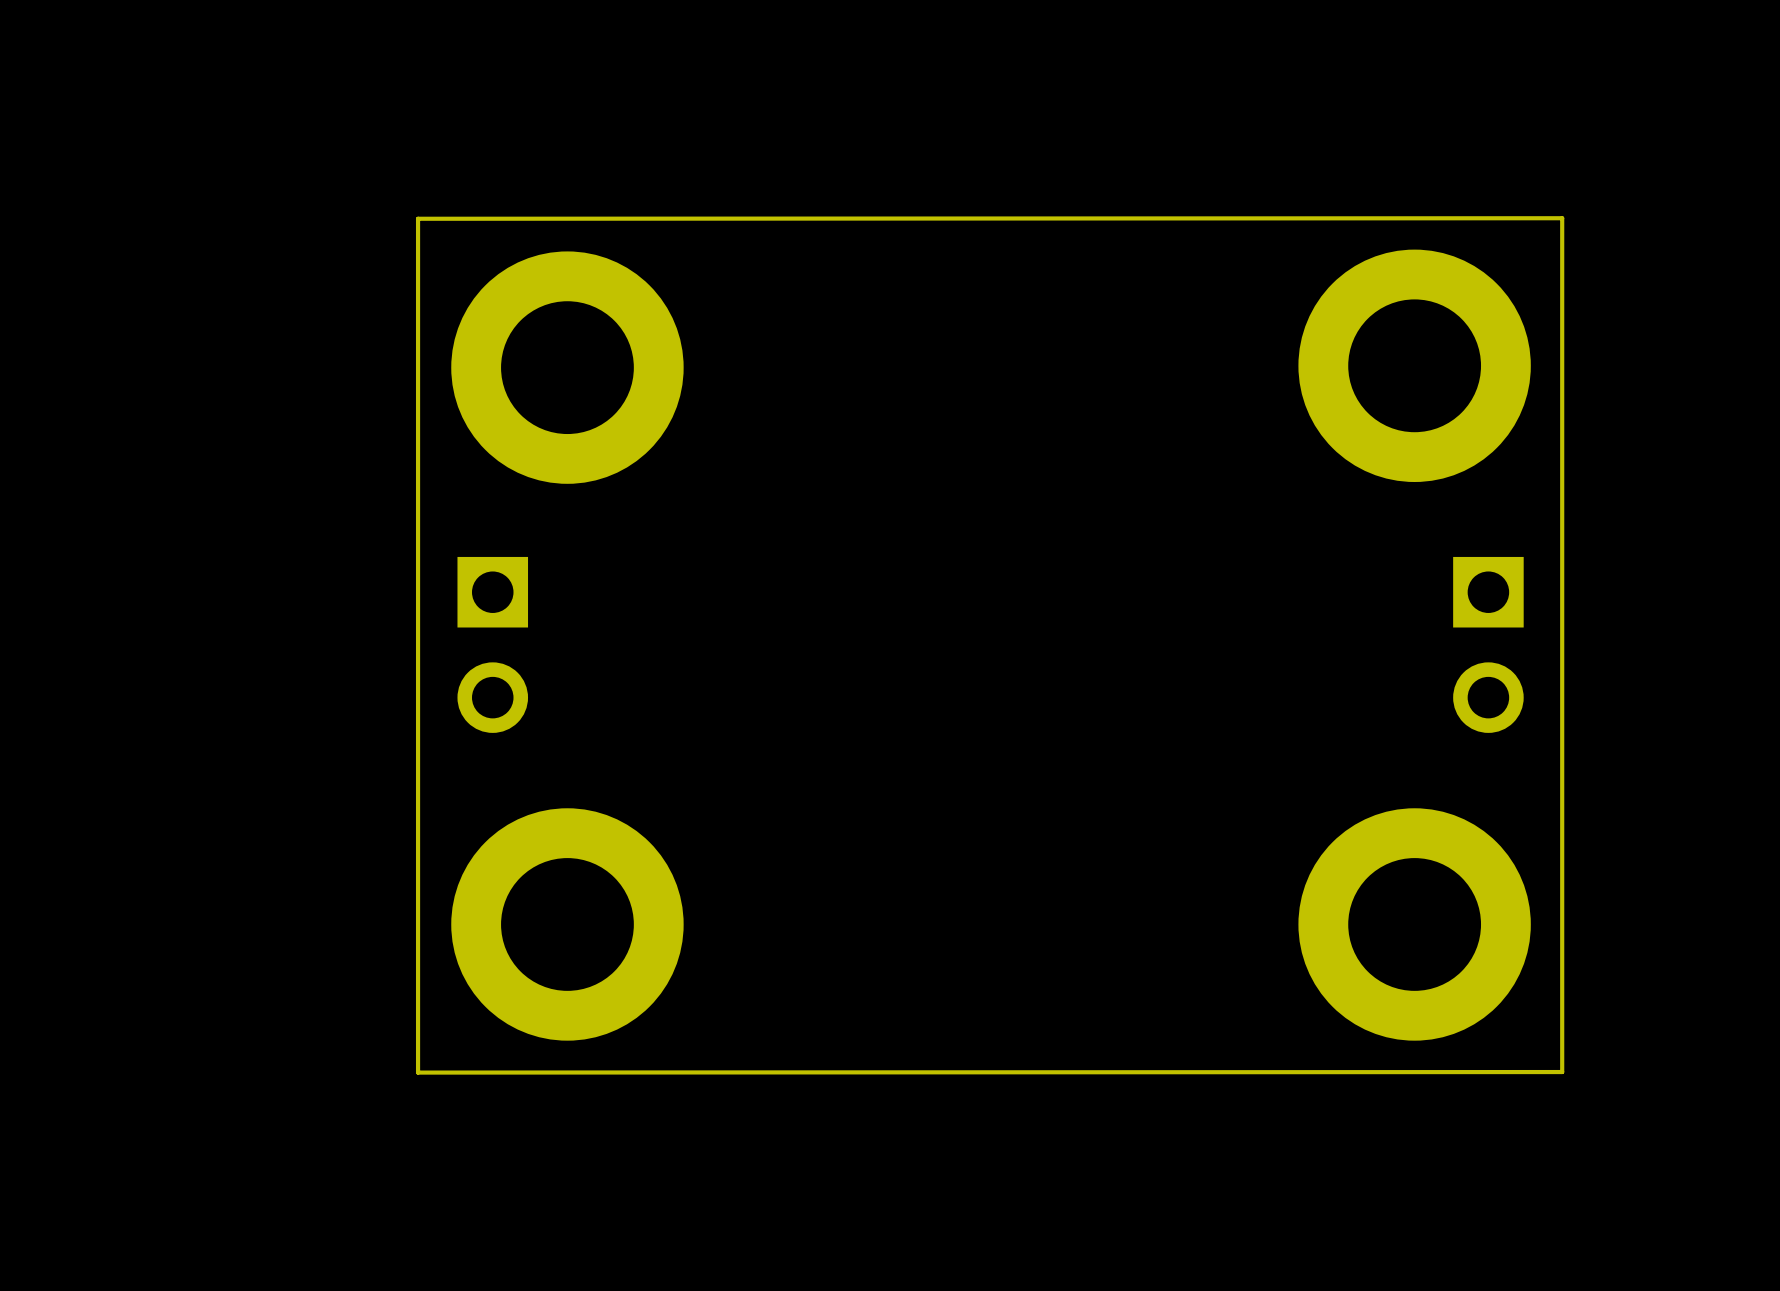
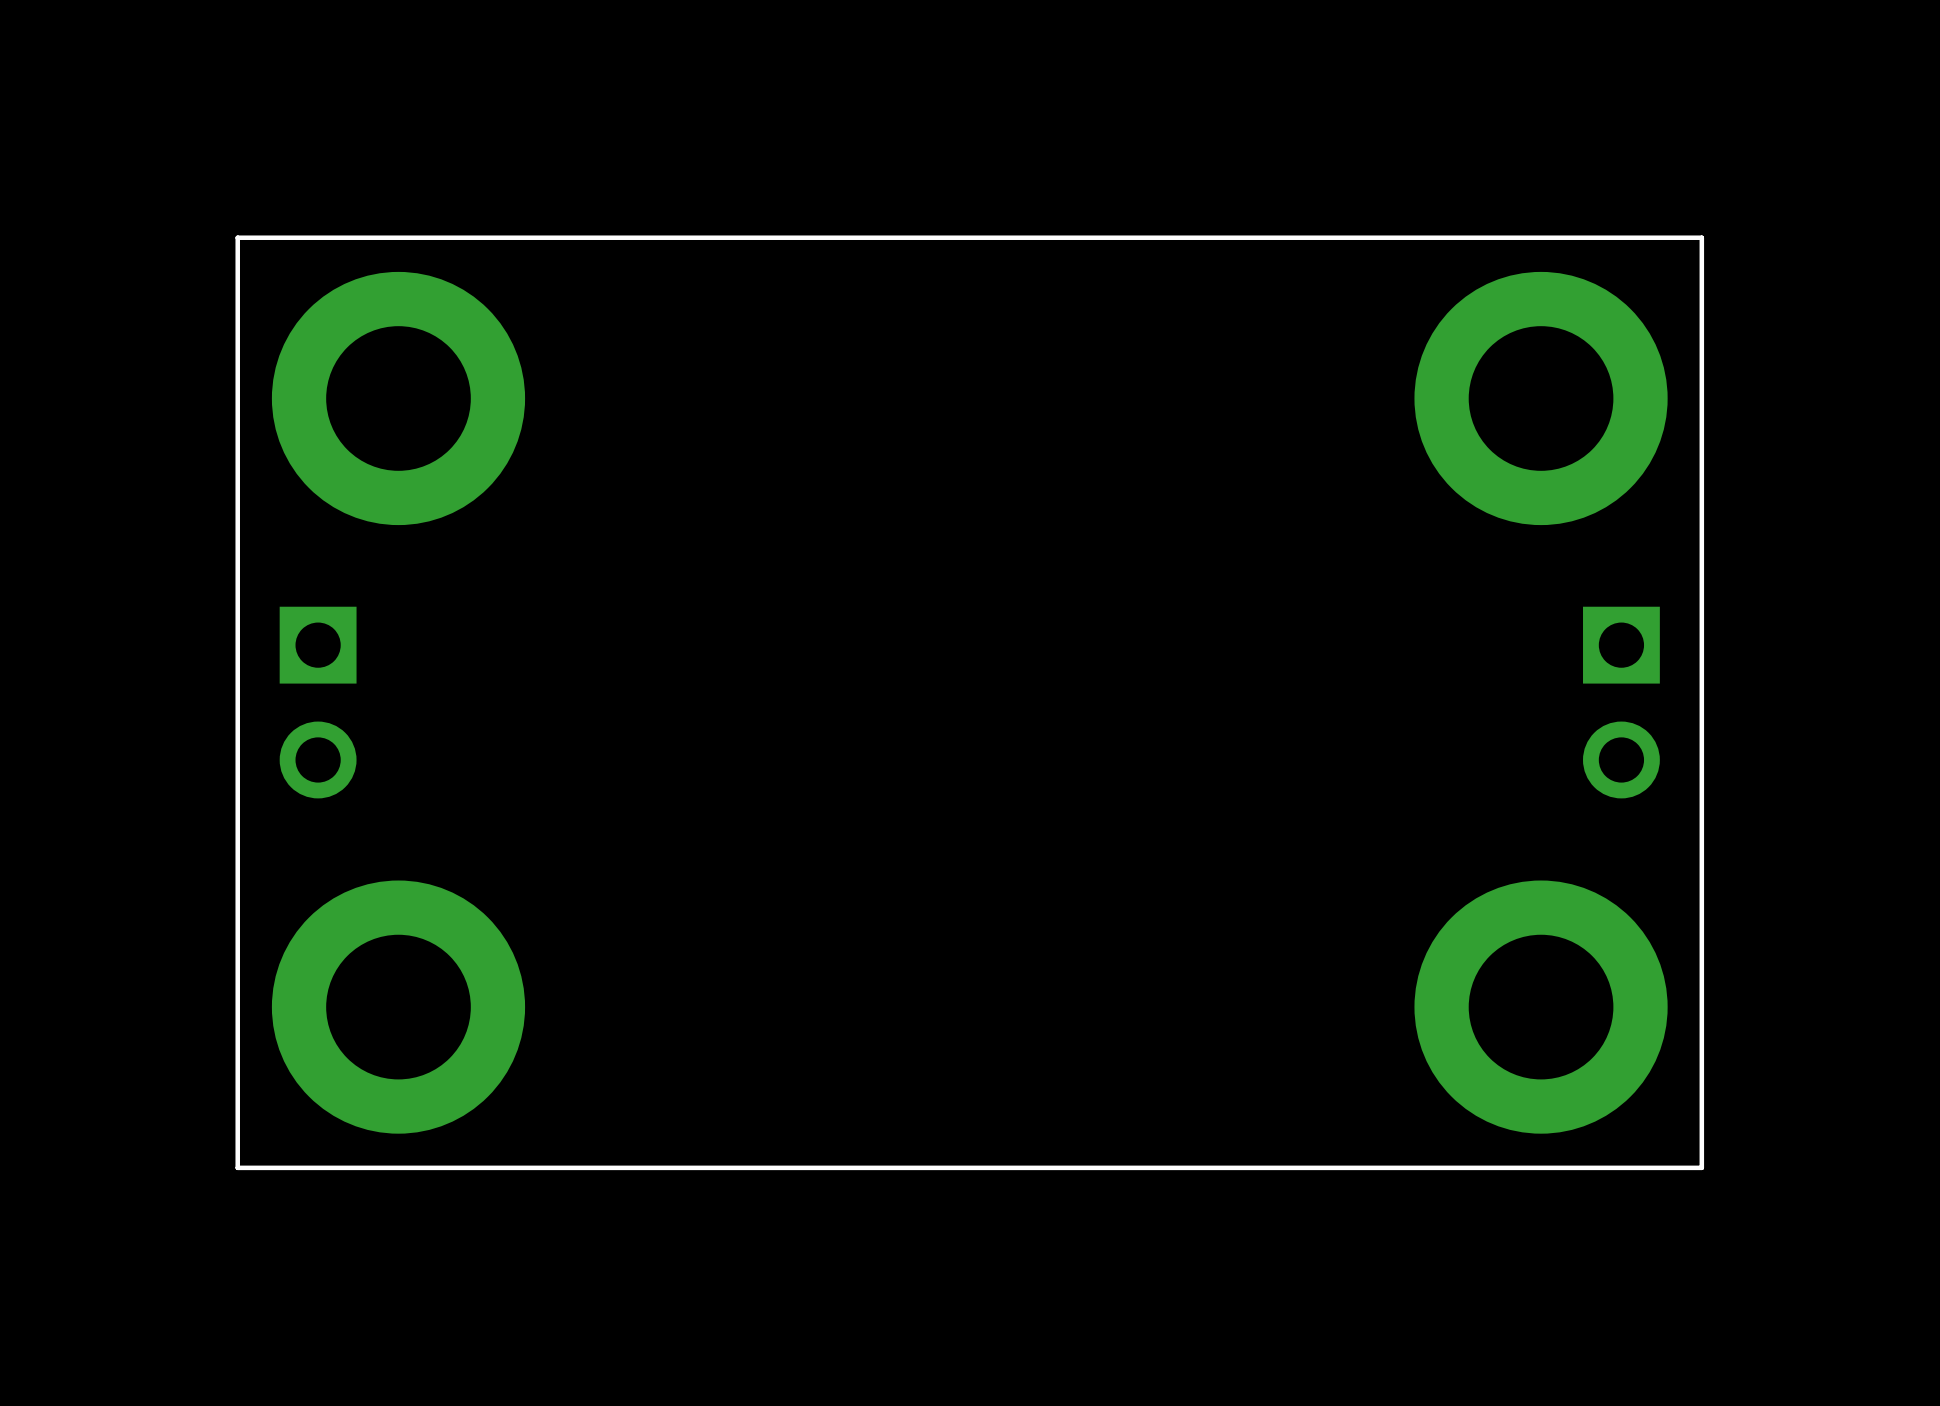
board edge: (1562, 218) (418, 218) (418, 1072) (1562, 1072) -> (1701, 237) (237, 237) (237, 1167) (1701, 1167)
part position: (567, 367) -> (398, 398)
part position: (492, 644) -> (318, 702)
part position: (567, 924) -> (398, 1007)

